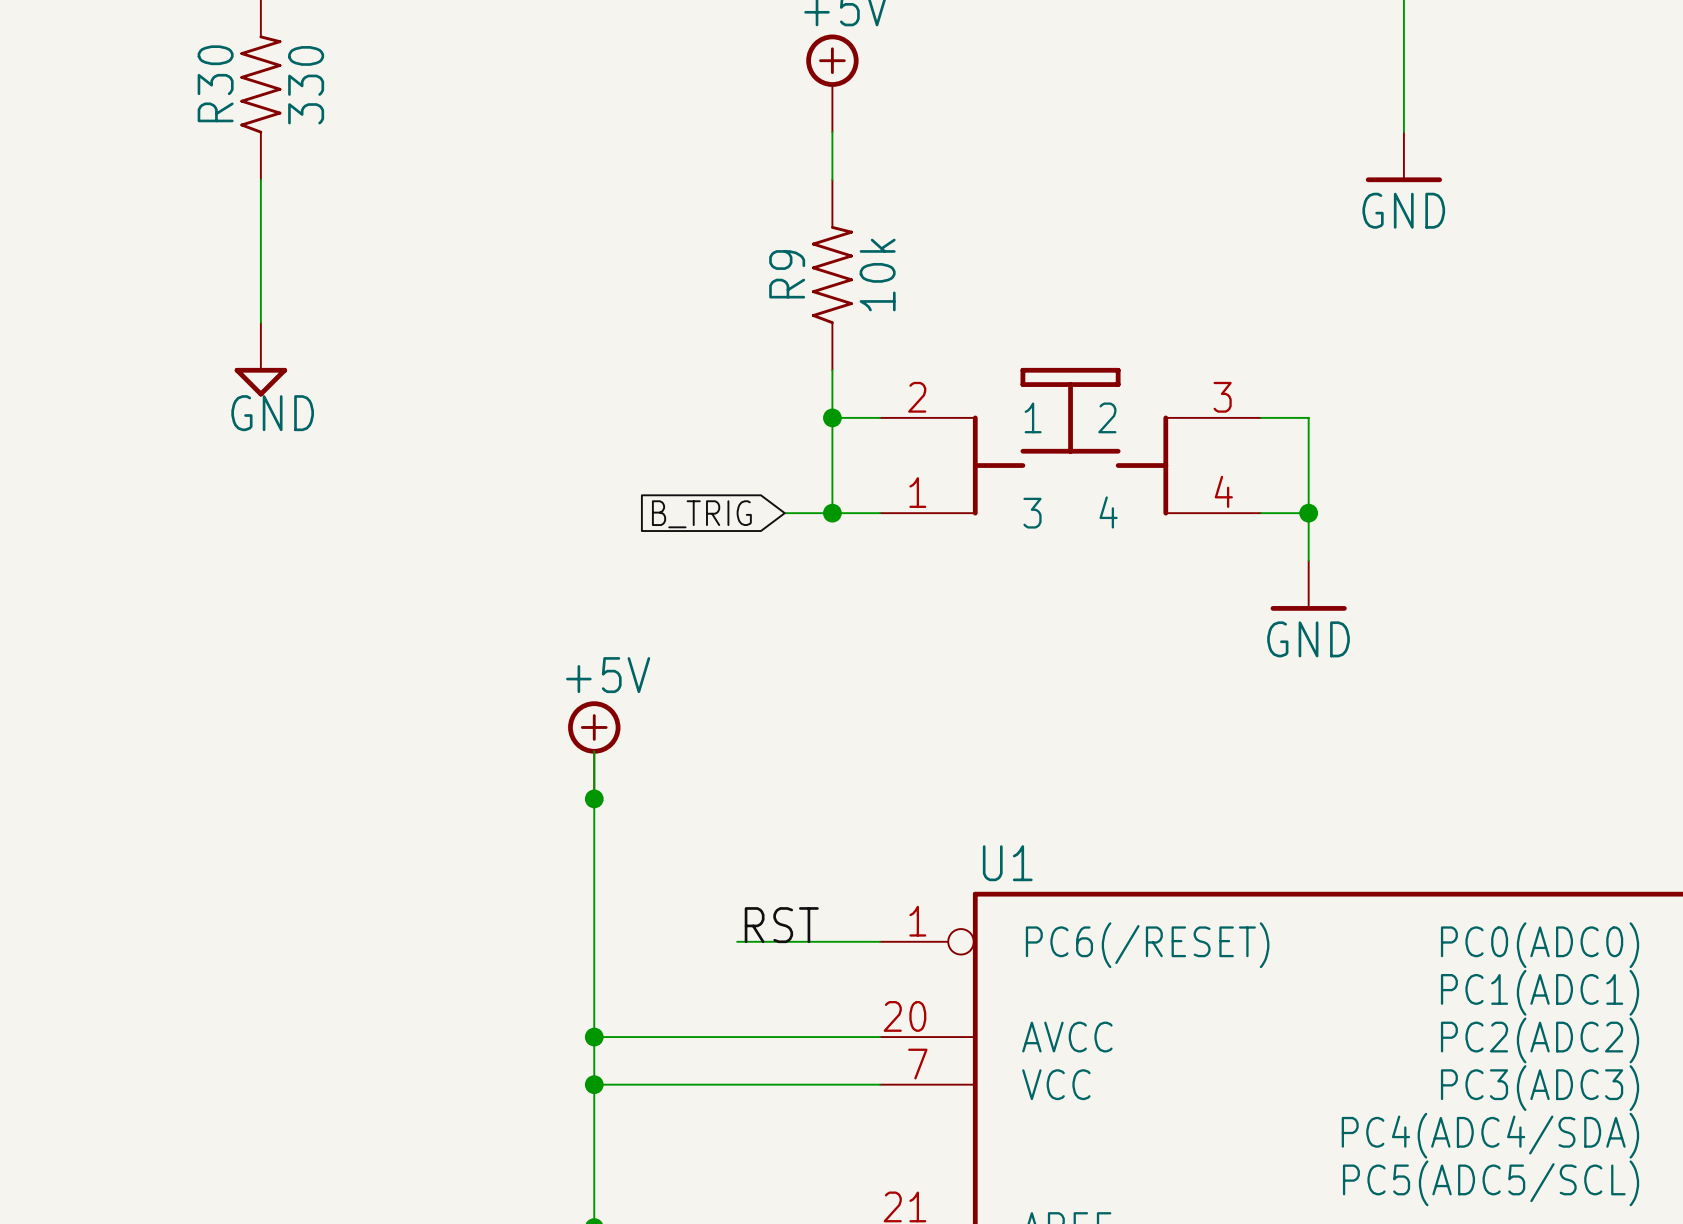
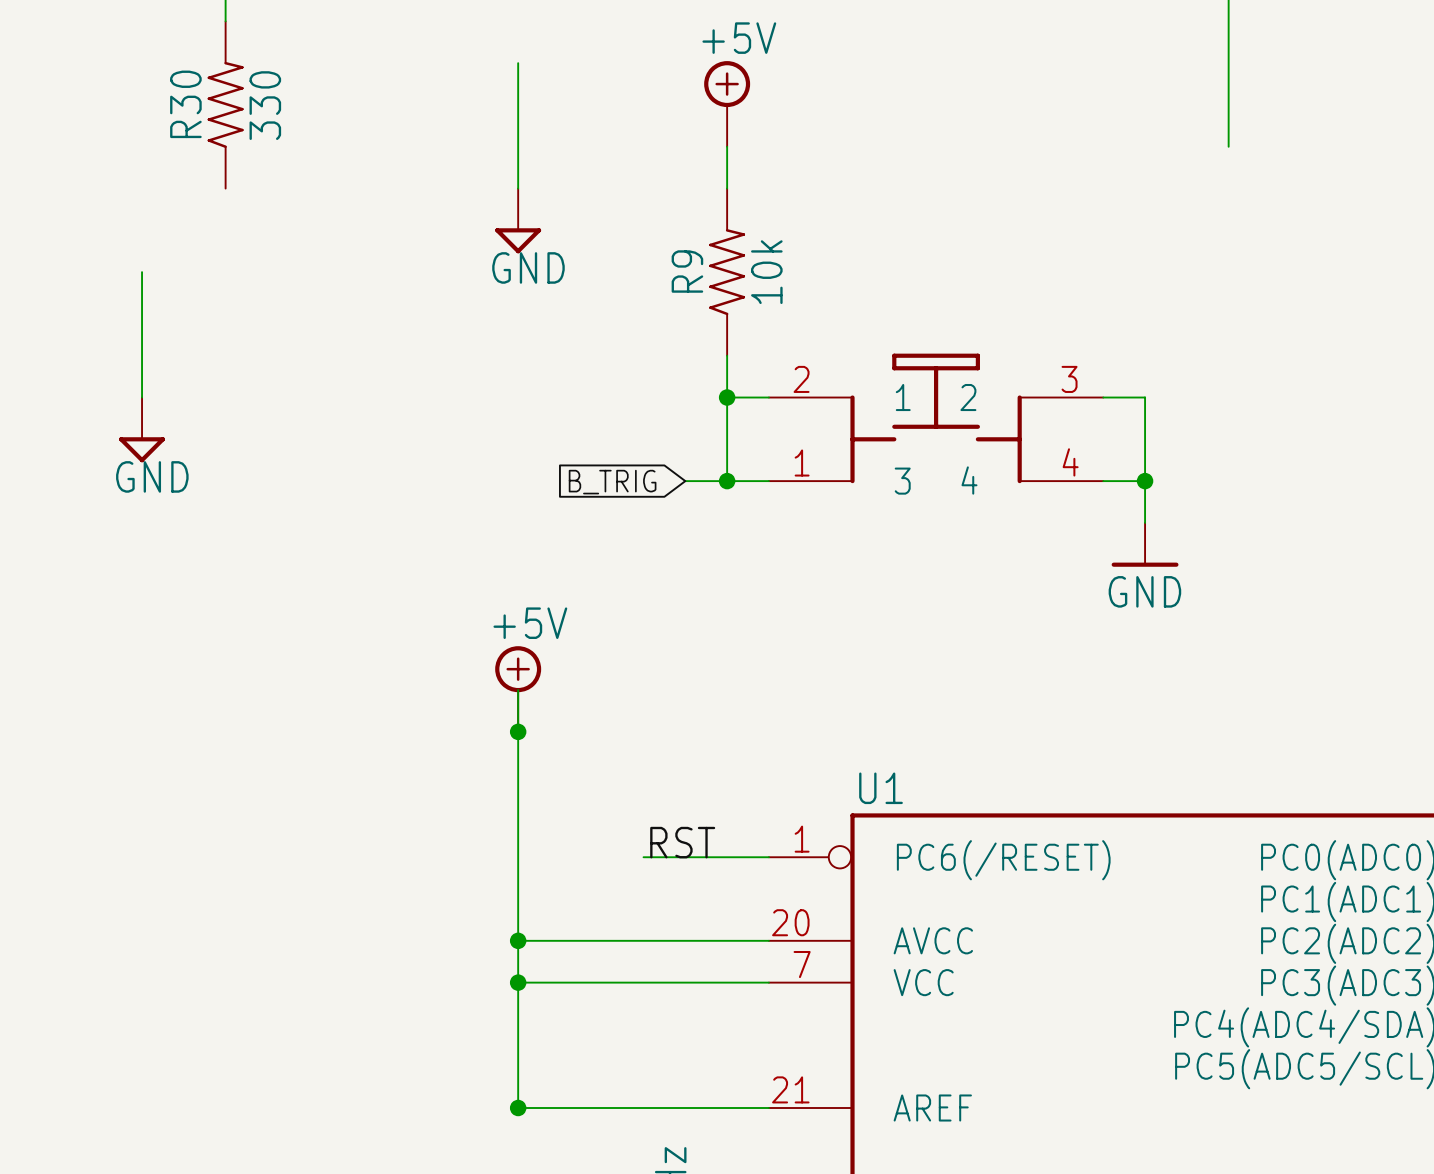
wire: none -> (518, 63) (518, 188)
power symbol: GND (1403, 157) -> none
wire: (260, 179) (260, 322) -> (142, 272) (142, 397)
power symbol: none -> GND (518, 220)
power symbol position: GND (260, 359) -> GND (142, 429)

